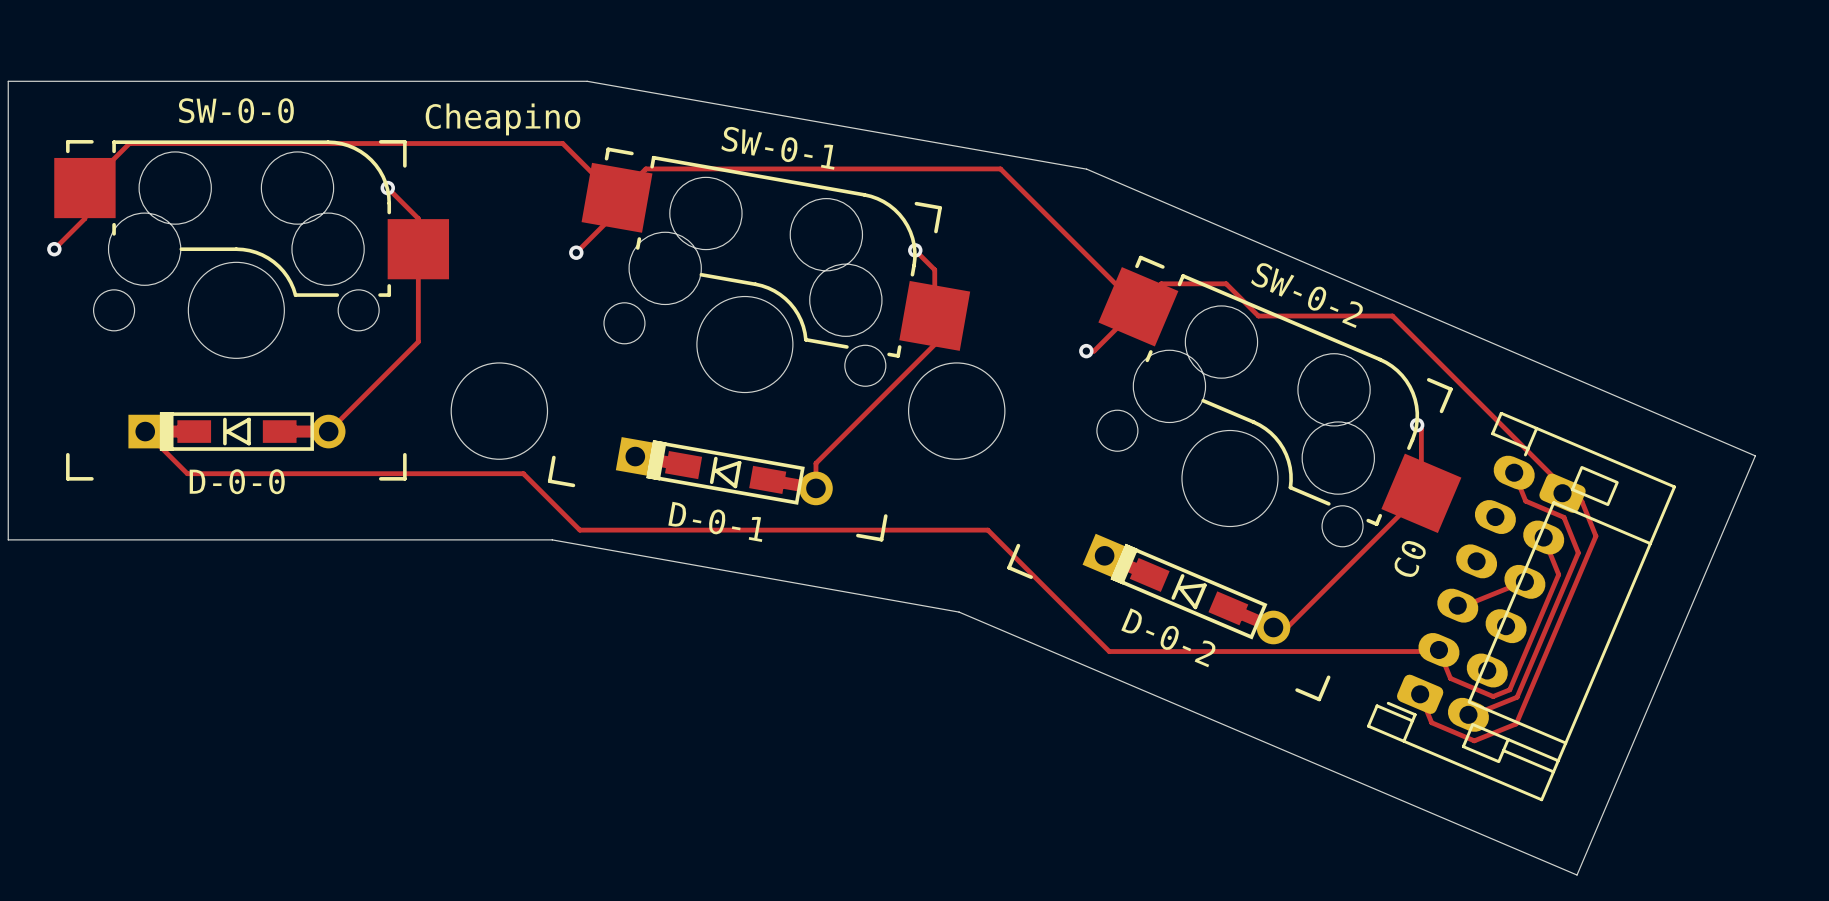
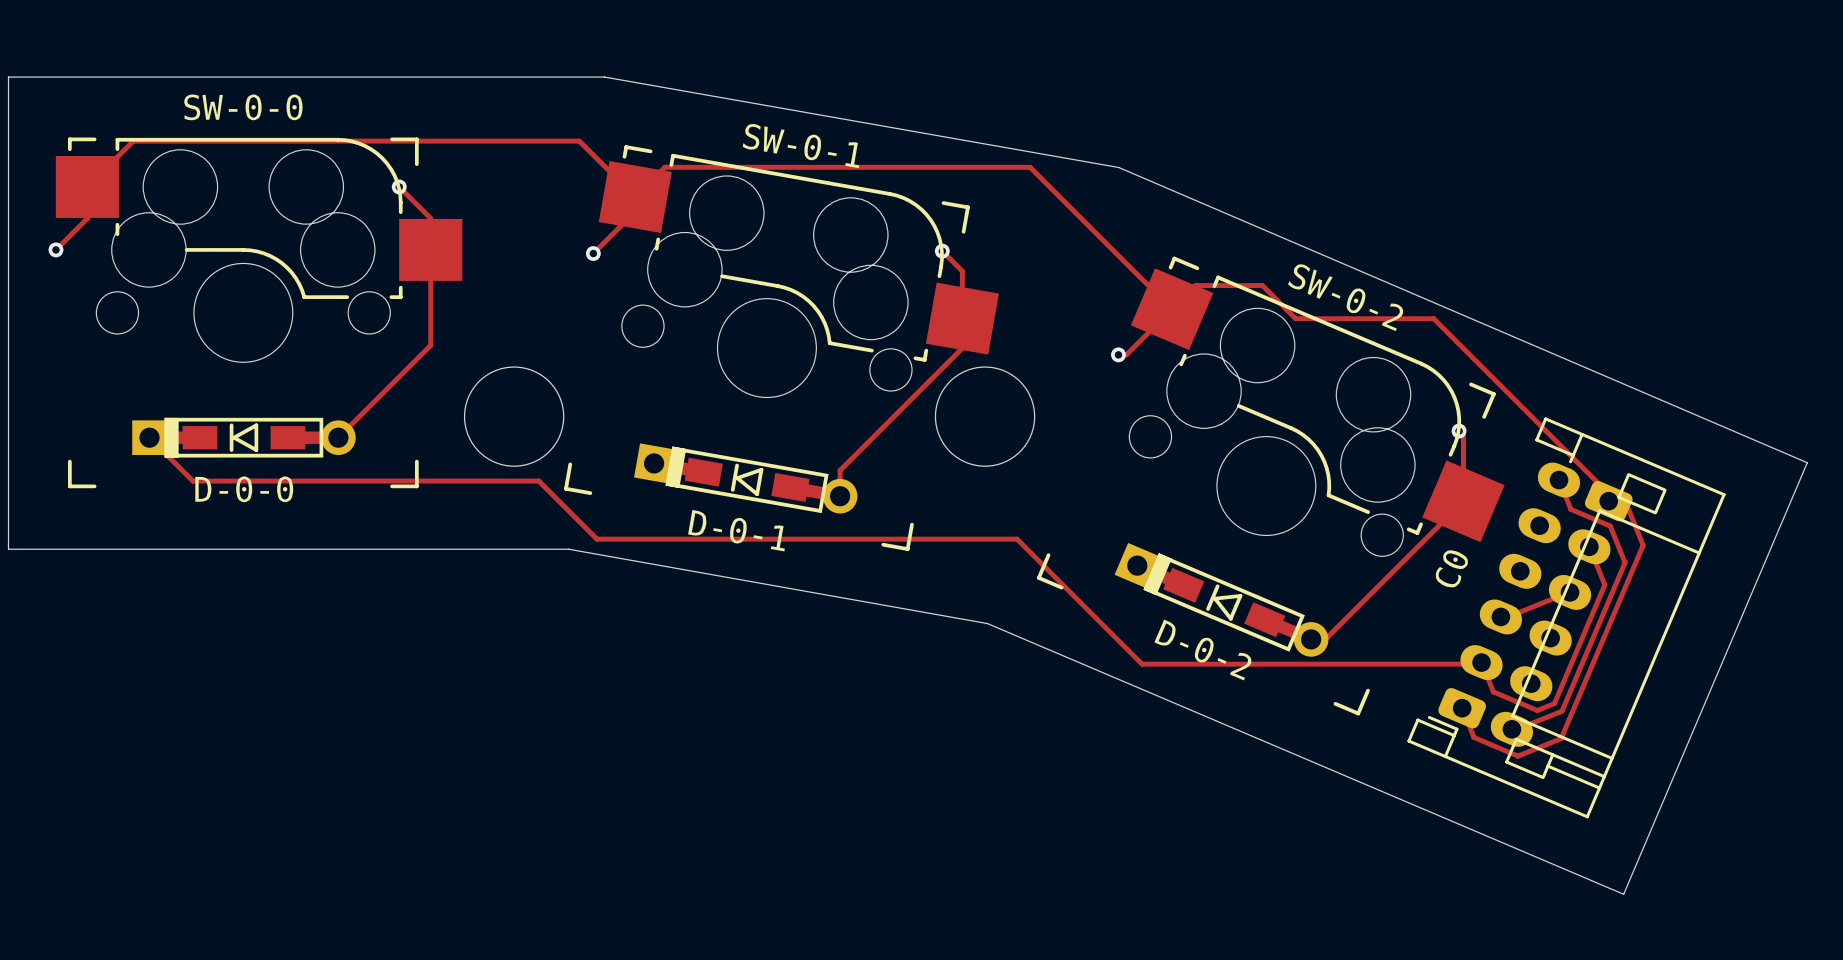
text: Cheapino (502, 119) -> none

